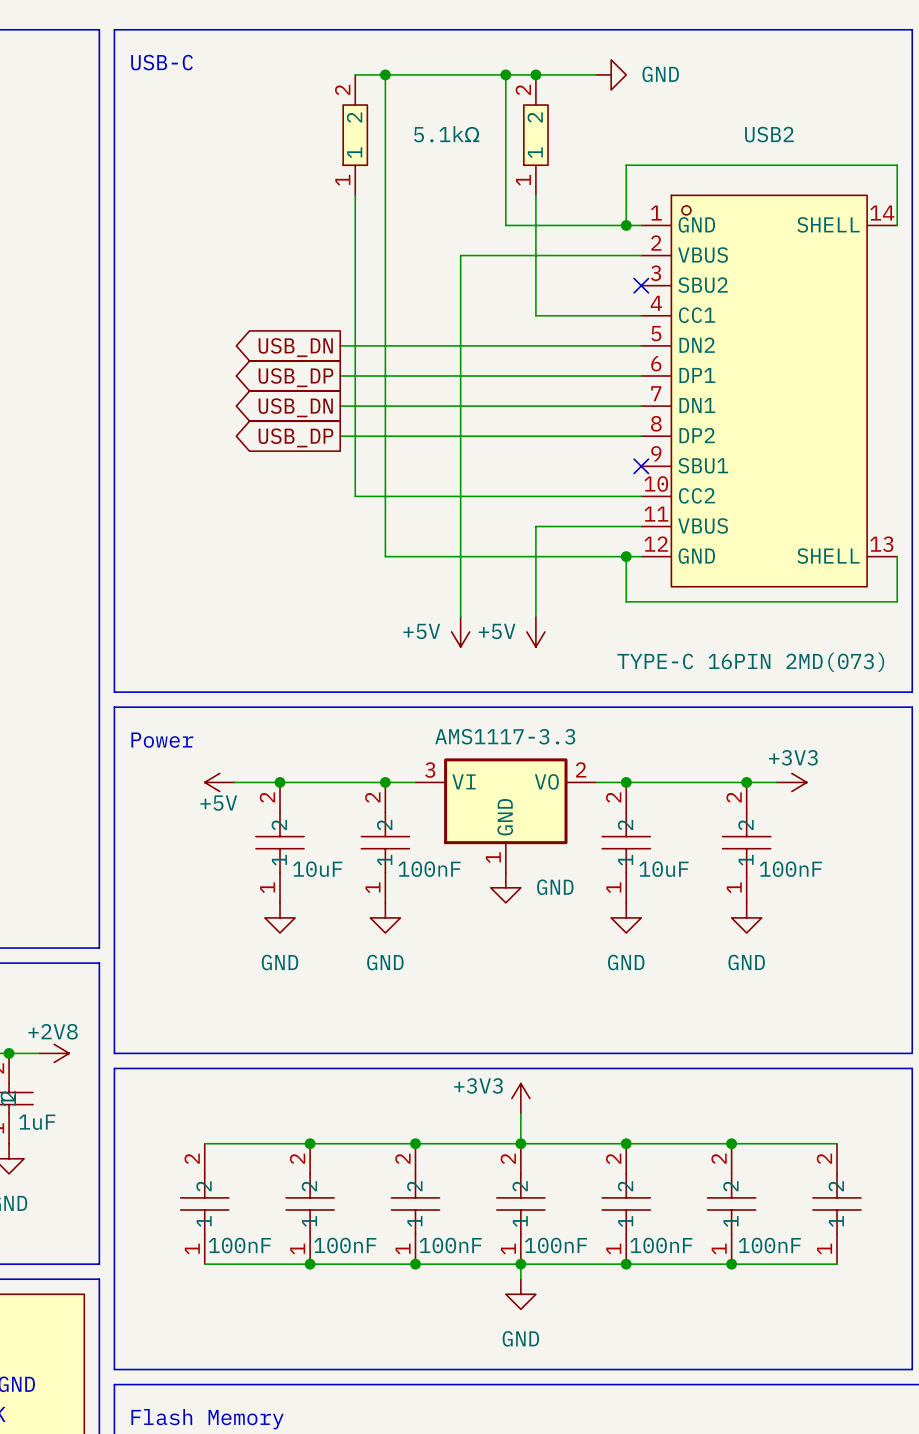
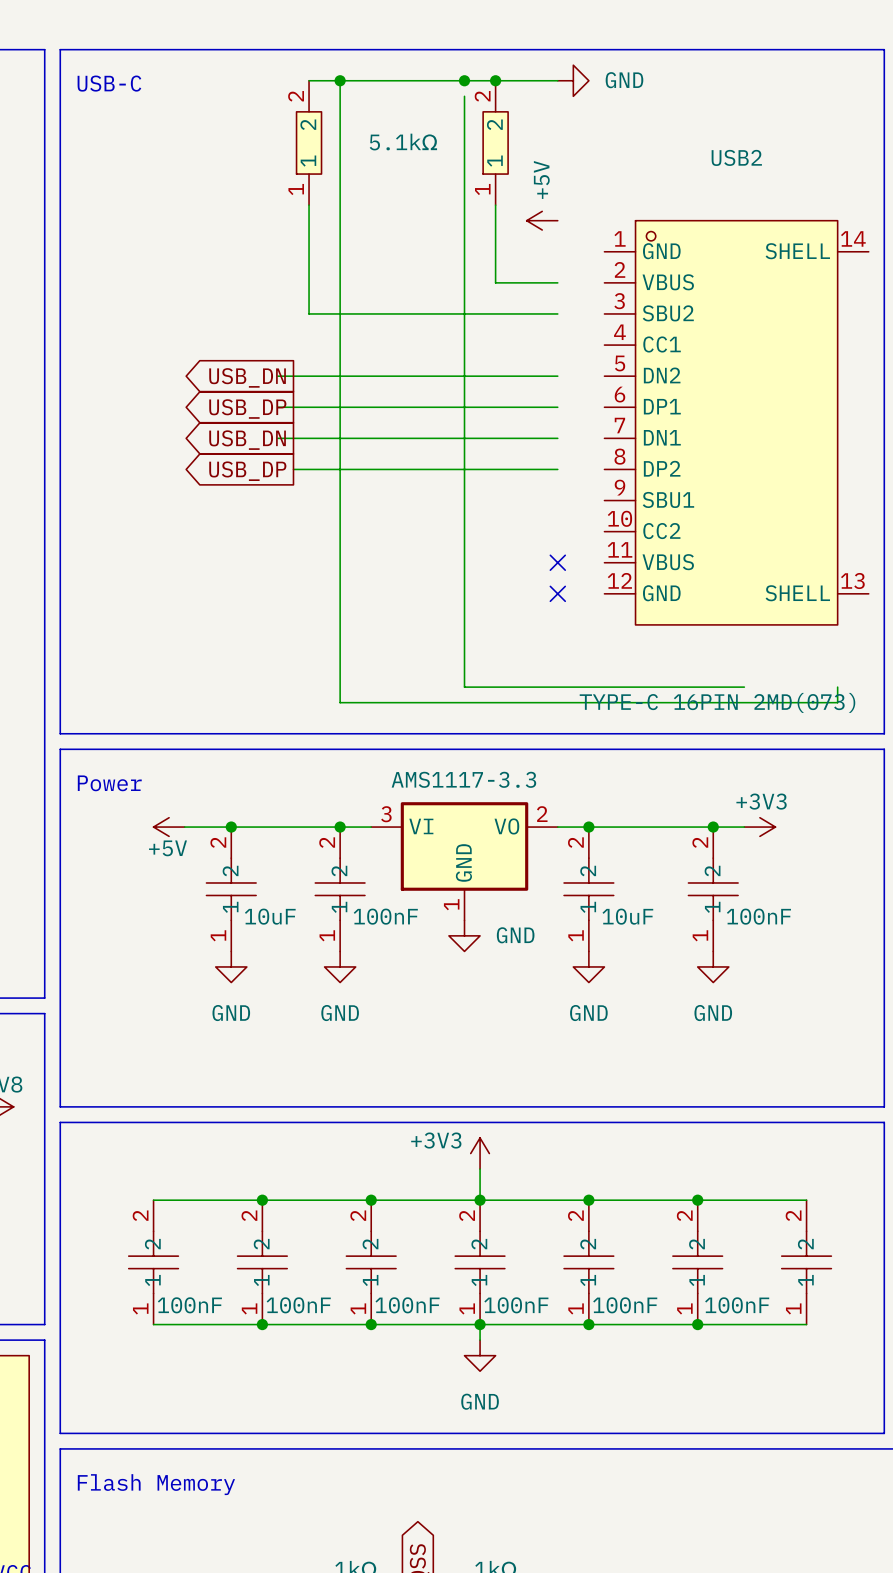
wire: none -> (340, 80) (340, 96)
wire: (355, 74) (596, 74) -> (309, 80) (557, 80)
junction position: (385, 74) -> (340, 80)
junction position: (505, 74) -> (464, 80)
junction position: (535, 74) -> (495, 80)
power symbol position: GND (611, 74) -> GND (573, 80)
part position: (355, 135) -> (309, 142)
part position: (535, 135) -> (495, 142)
power symbol: none -> +5V (542, 220)
wire: (505, 225) (641, 225) -> (464, 251) (464, 687) (744, 687)
wire: (626, 225) (626, 165) (897, 165) (897, 225) -> none
junction: (626, 225) -> none
wire: (596, 255) (641, 255) -> none
wire: (355, 285) (355, 496) (641, 496) -> (309, 313) (557, 313)
no-connect mark: (641, 285) -> none
wire: (641, 315) (535, 315) (535, 255) (460, 255) (460, 616) -> none
wire: none -> (277, 376) (293, 376)
wire: (596, 345) (641, 345) -> none
wire: none -> (277, 407) (293, 407)
wire: (596, 375) (641, 375) -> none
wire: none -> (277, 438) (293, 438)
wire: (596, 406) (641, 406) -> none
wire: (596, 436) (641, 436) -> none
no-connect mark: (641, 466) -> none
no-connect mark: none -> (557, 562)
wire: (641, 526) (535, 526) (535, 616) -> none
wire: (385, 556) (641, 556) -> (340, 593) (340, 702) (837, 702) (837, 687)
no-connect mark: none -> (557, 593)
wire: (626, 556) (626, 601) (897, 601) (897, 556) -> none
junction: (626, 556) -> none
power symbol: +5V (460, 631) -> none
power symbol: +5V (535, 631) -> none

